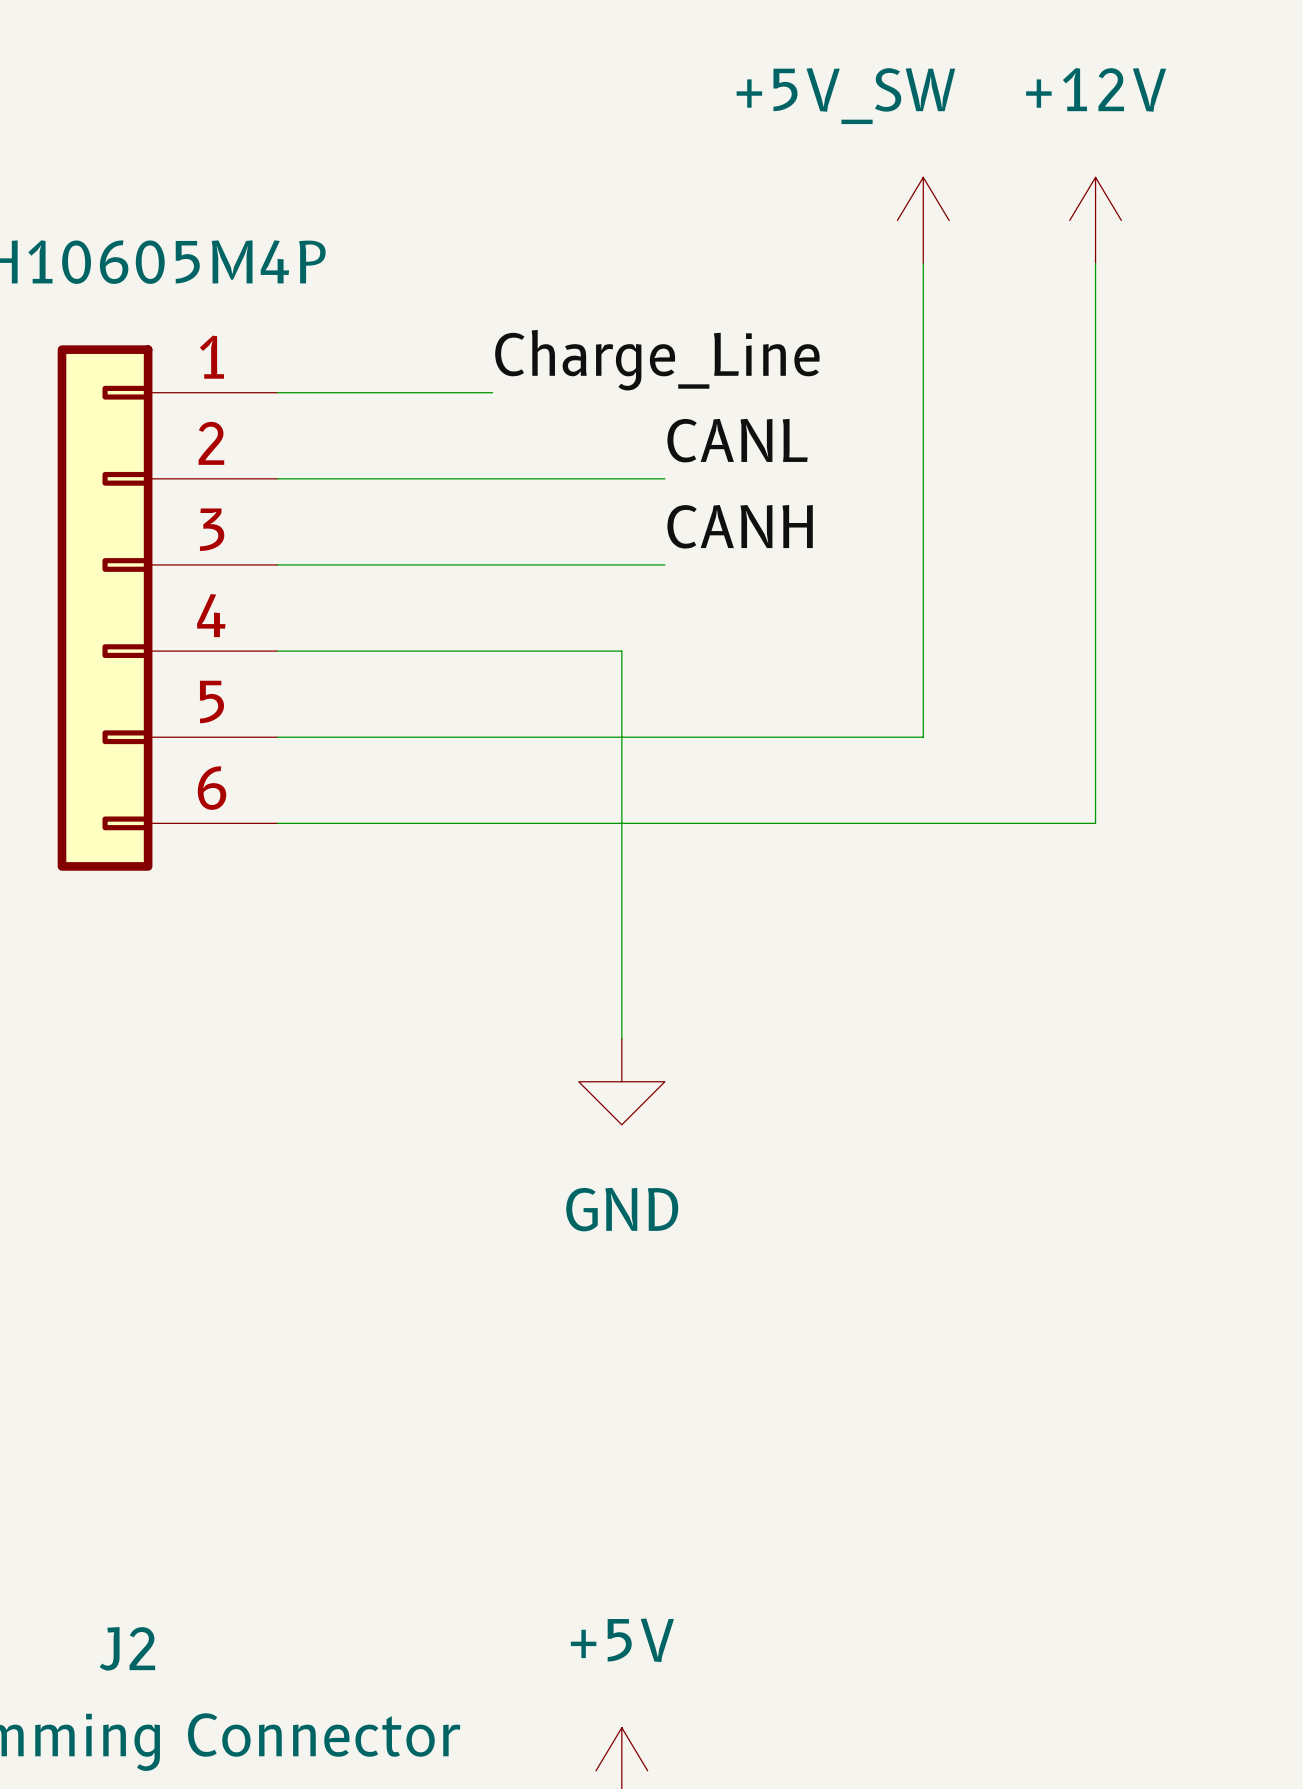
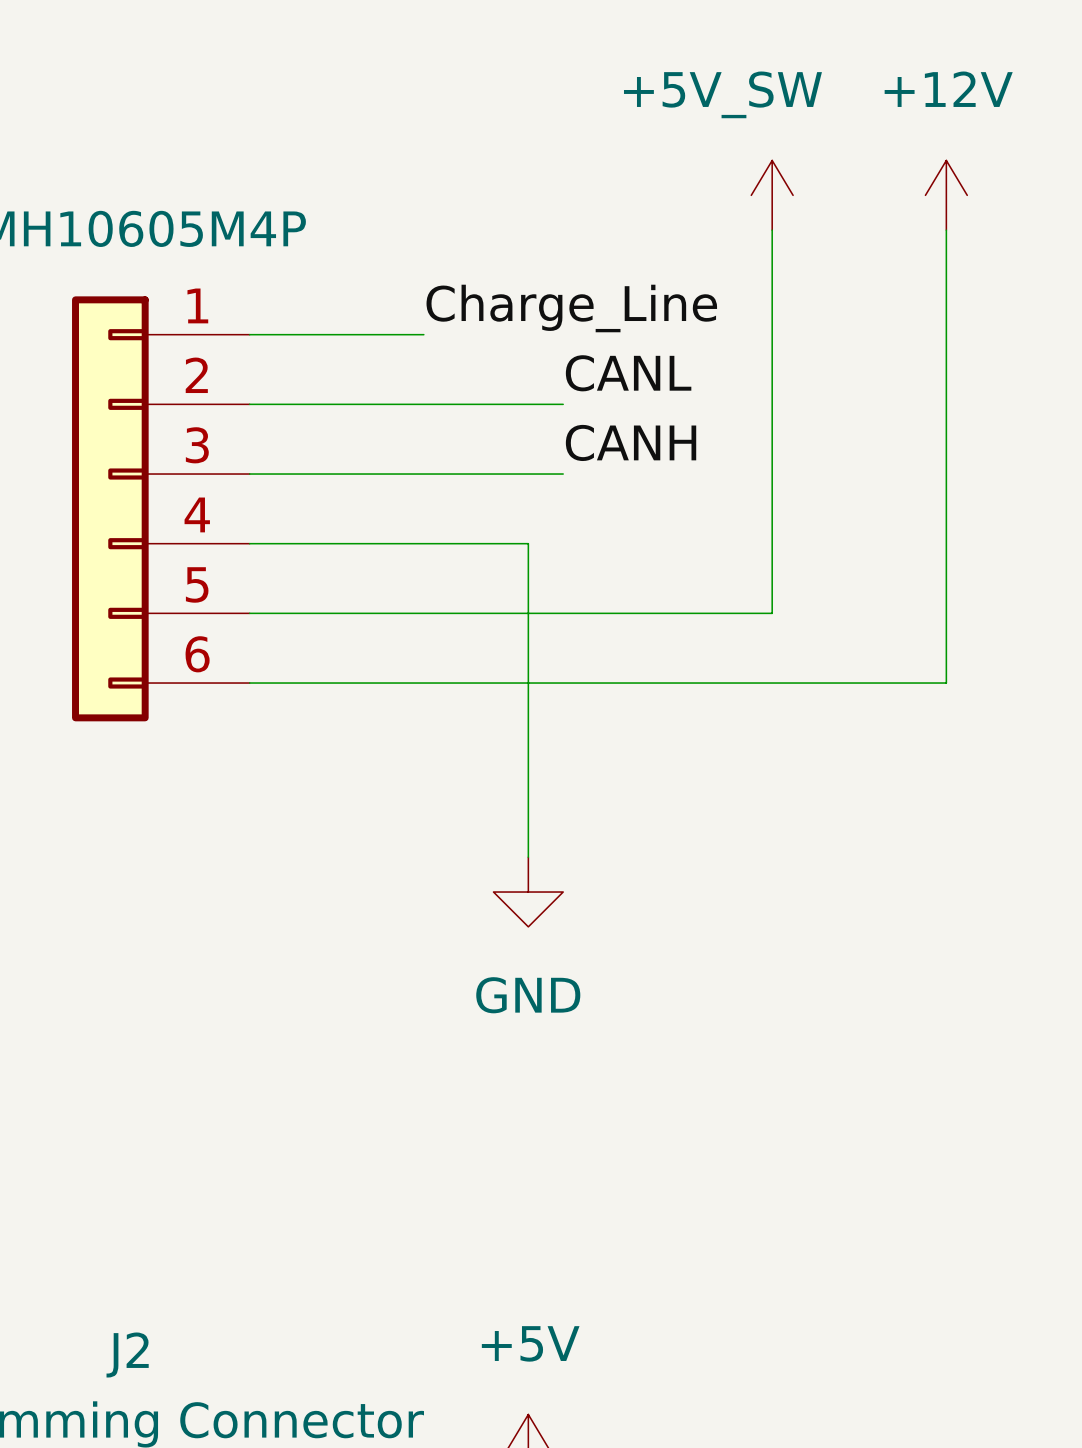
power symbol position: +12V (1095, 220) -> +12V (946, 195)
wire: (1095, 263) (1095, 823) -> (946, 230) (946, 683) (911, 683)

